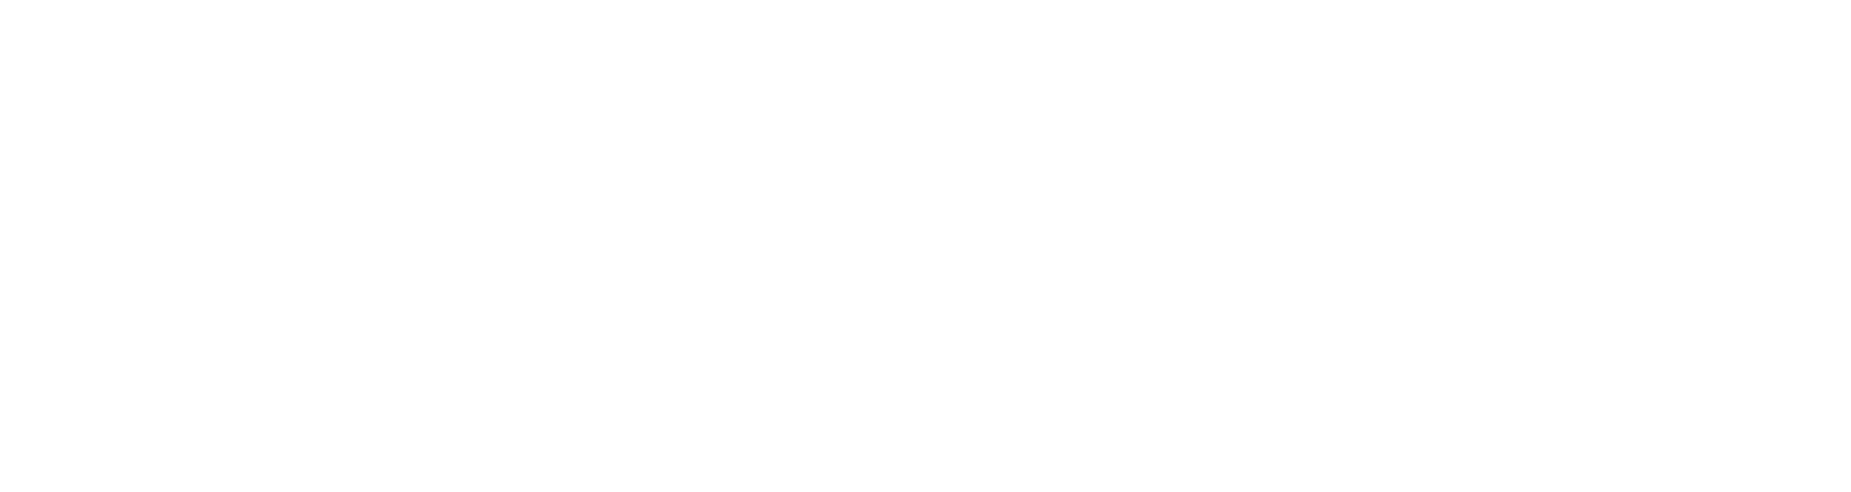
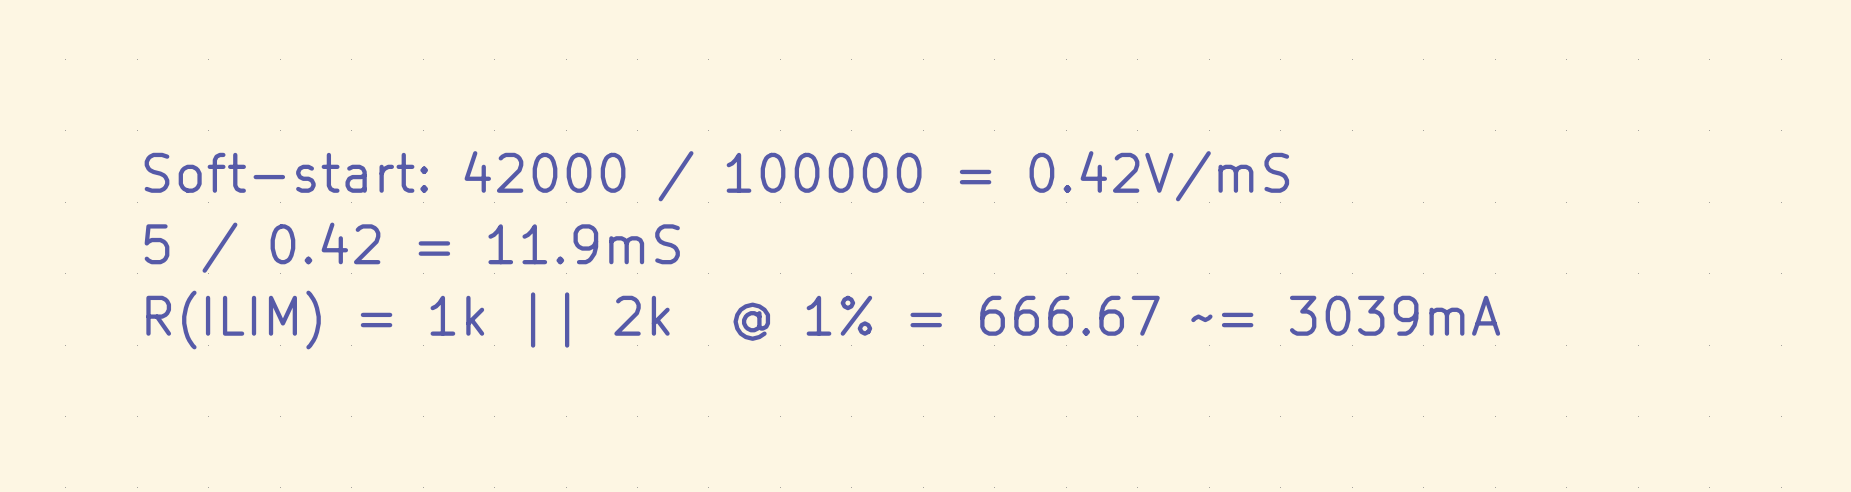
text: none -> Soft-start: 42000 / 100000 = 0.42V/mS (716, 176)
text: none -> 5 / 0.42 = 11.9mS (412, 247)
text: none -> R(ILIM) = 1k || 2k @ 1% = 666.67 ~= 3039mA (823, 320)

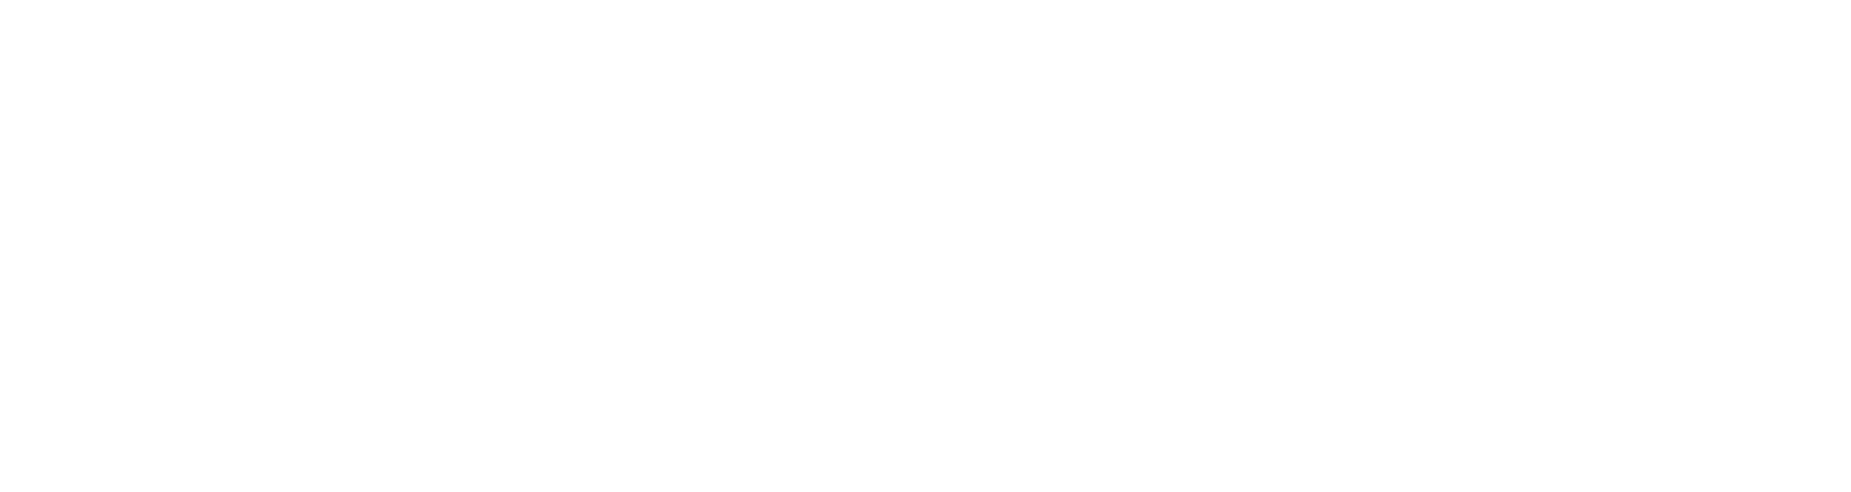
text: Soft-start: 42000 / 100000 = 0.42V/mS (716, 176) -> none
text: 5 / 0.42 = 11.9mS (412, 247) -> none
text: R(ILIM) = 1k || 2k @ 1% = 666.67 ~= 3039mA (823, 320) -> none

